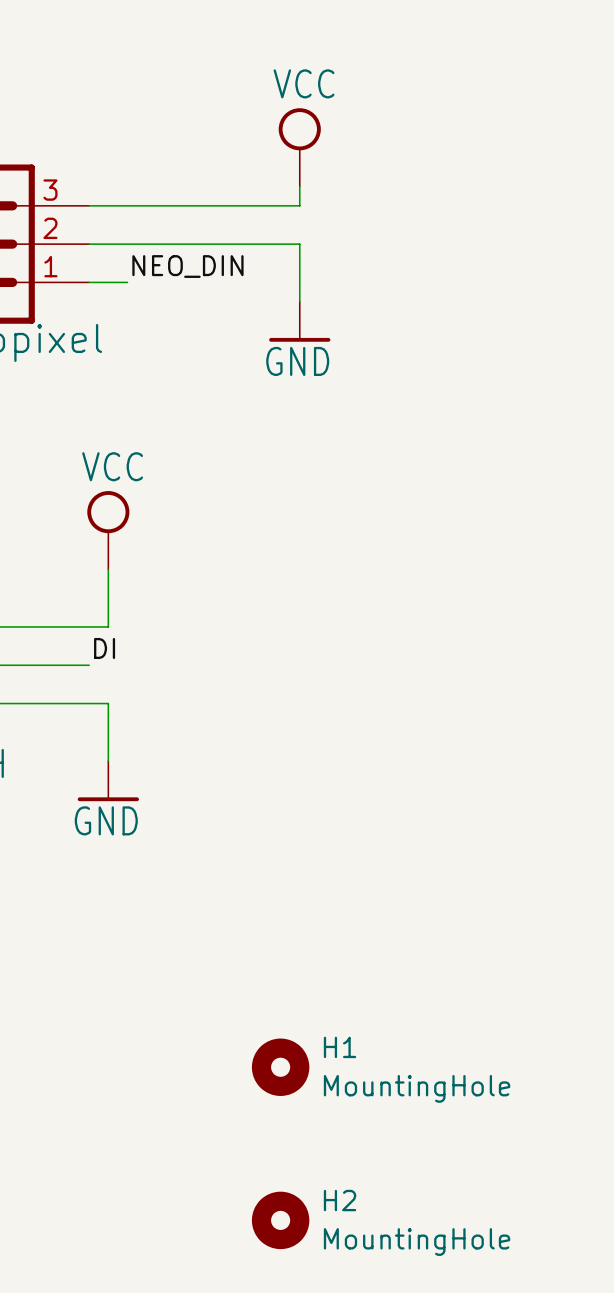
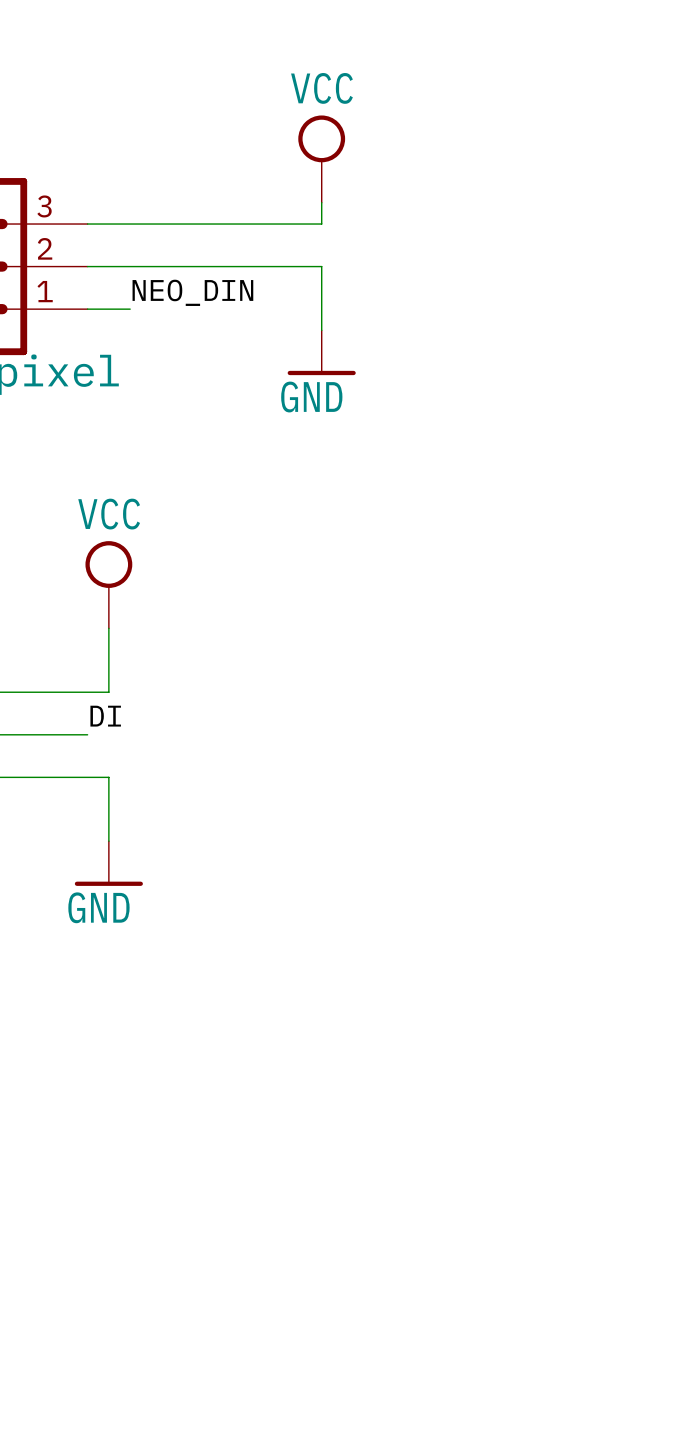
H1: MountingHole (280, 1067) -> none
H2: MountingHole (280, 1220) -> none

